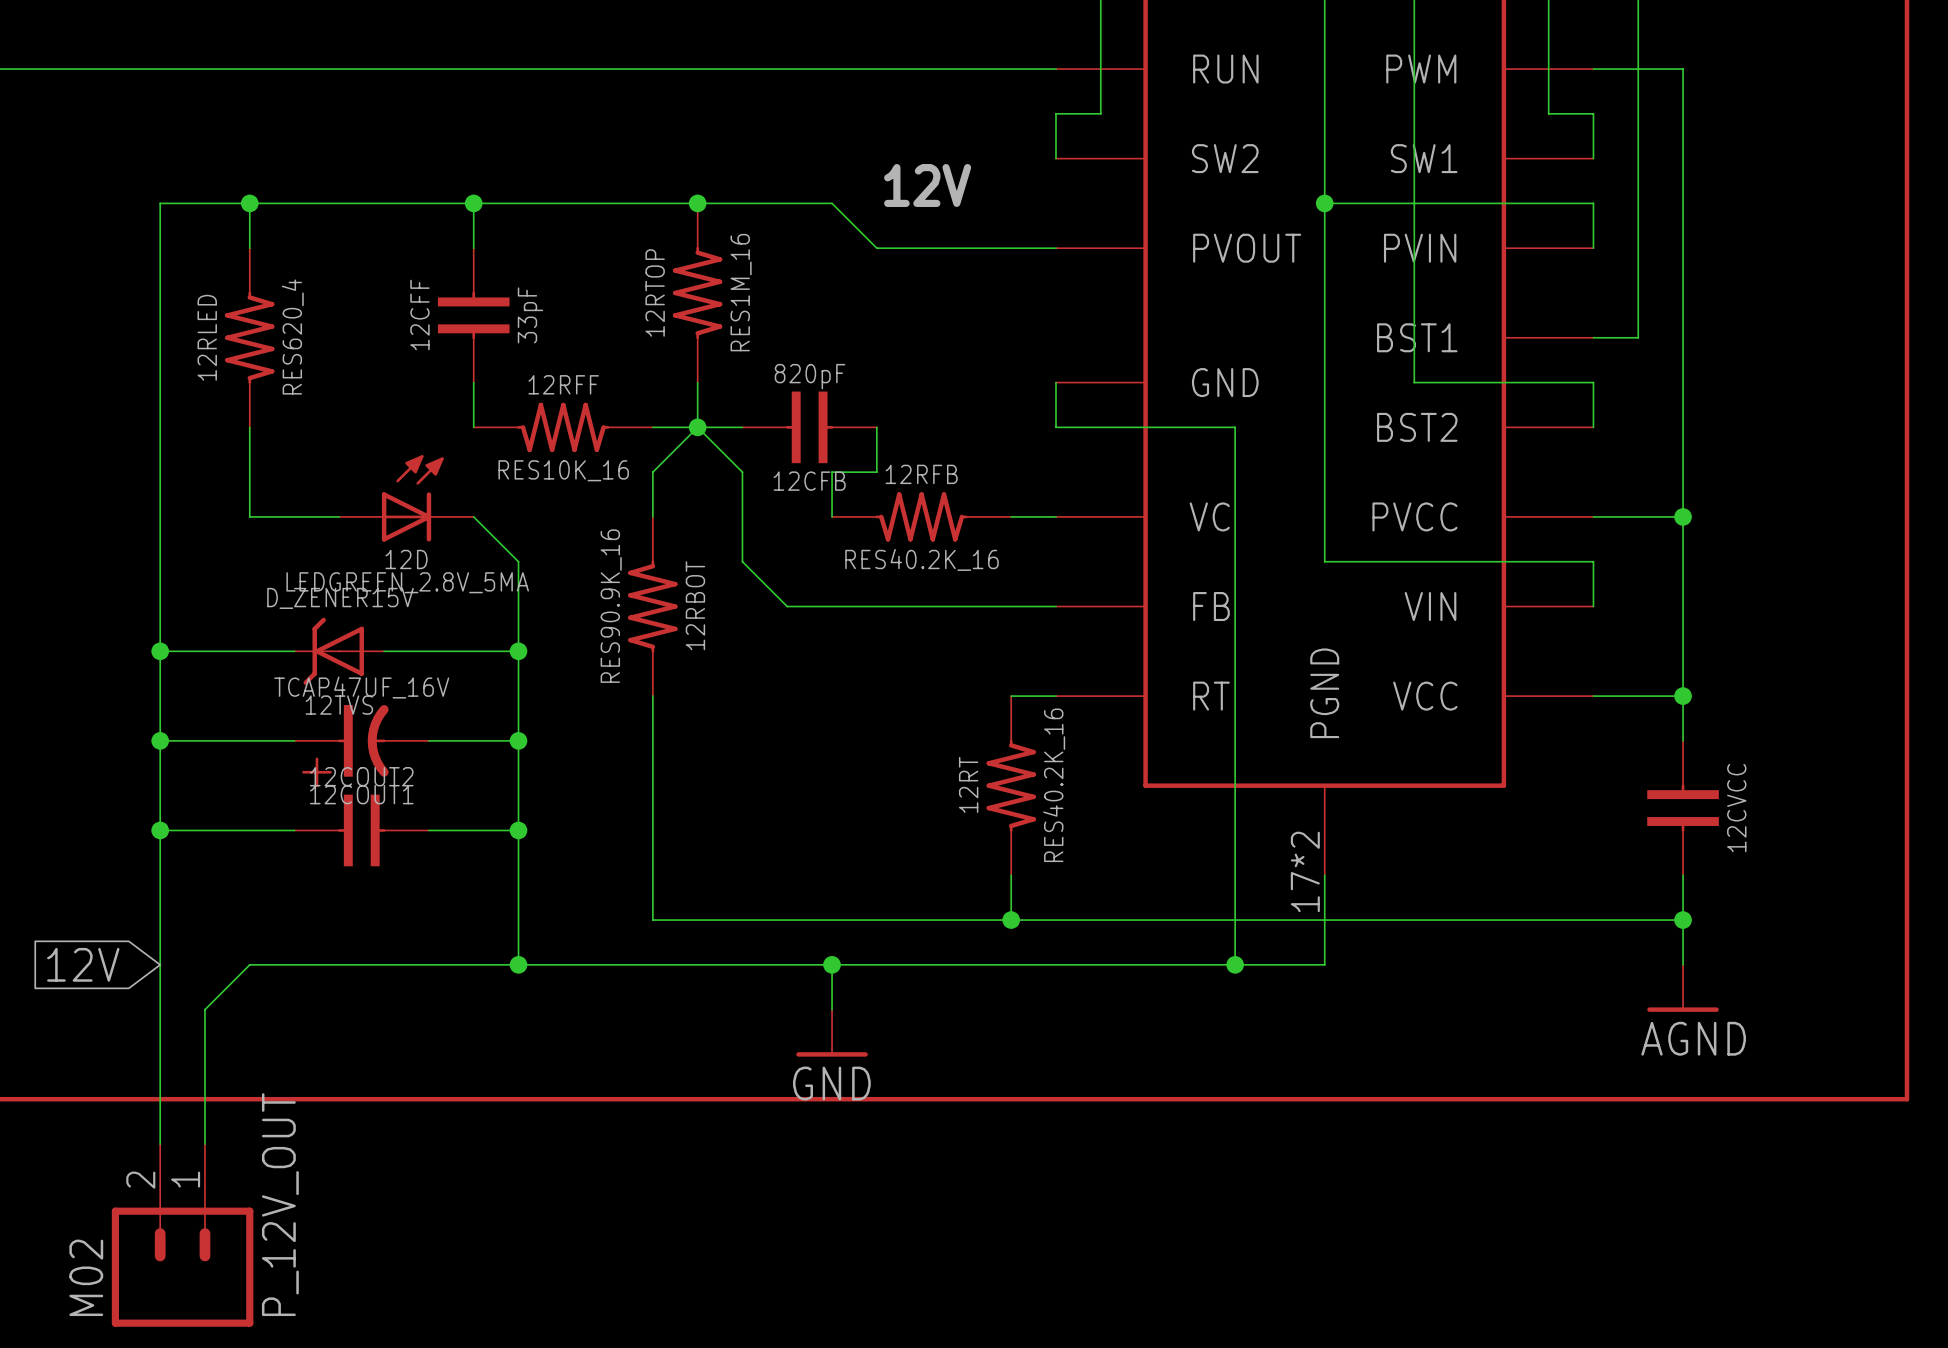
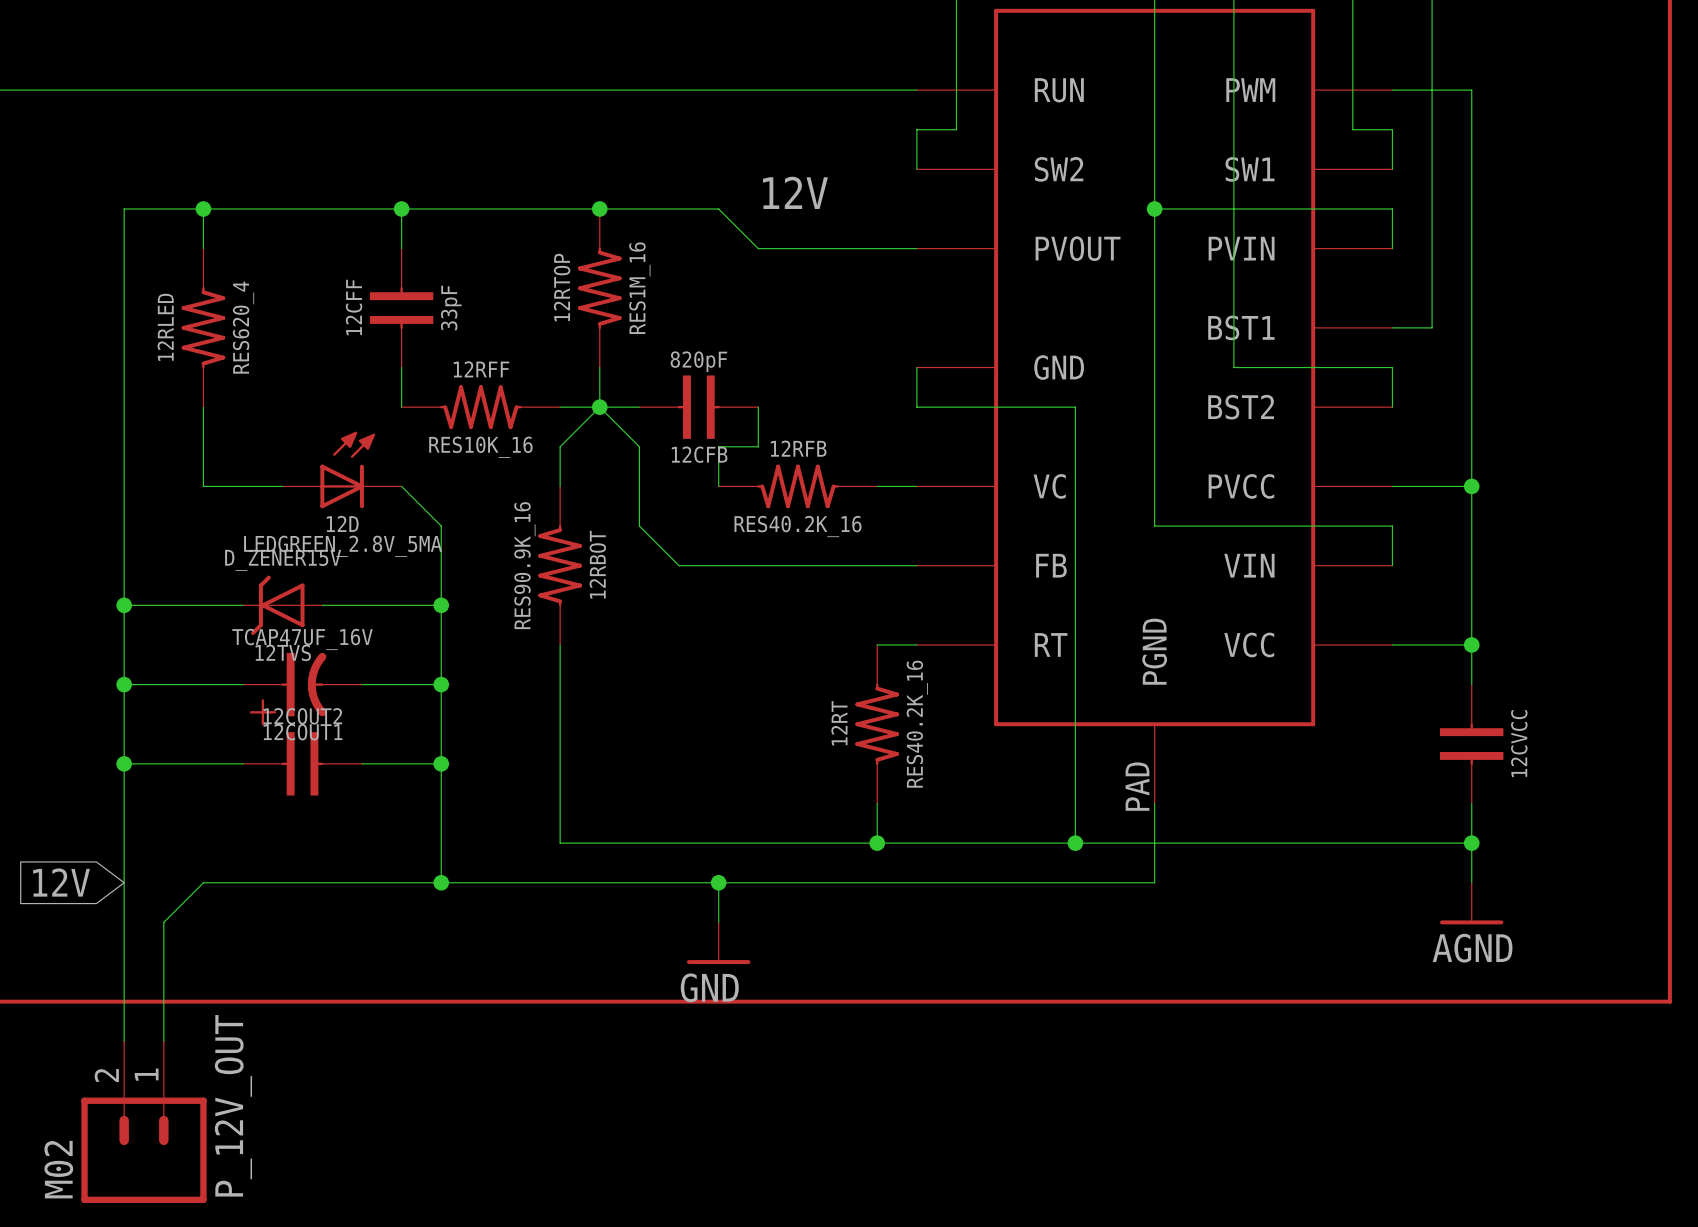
part pin number: 17*2 (1305, 871) -> PAD (1137, 786)
wire: (1235, 920) (1235, 964) -> none
junction position: (1235, 964) -> (1075, 843)

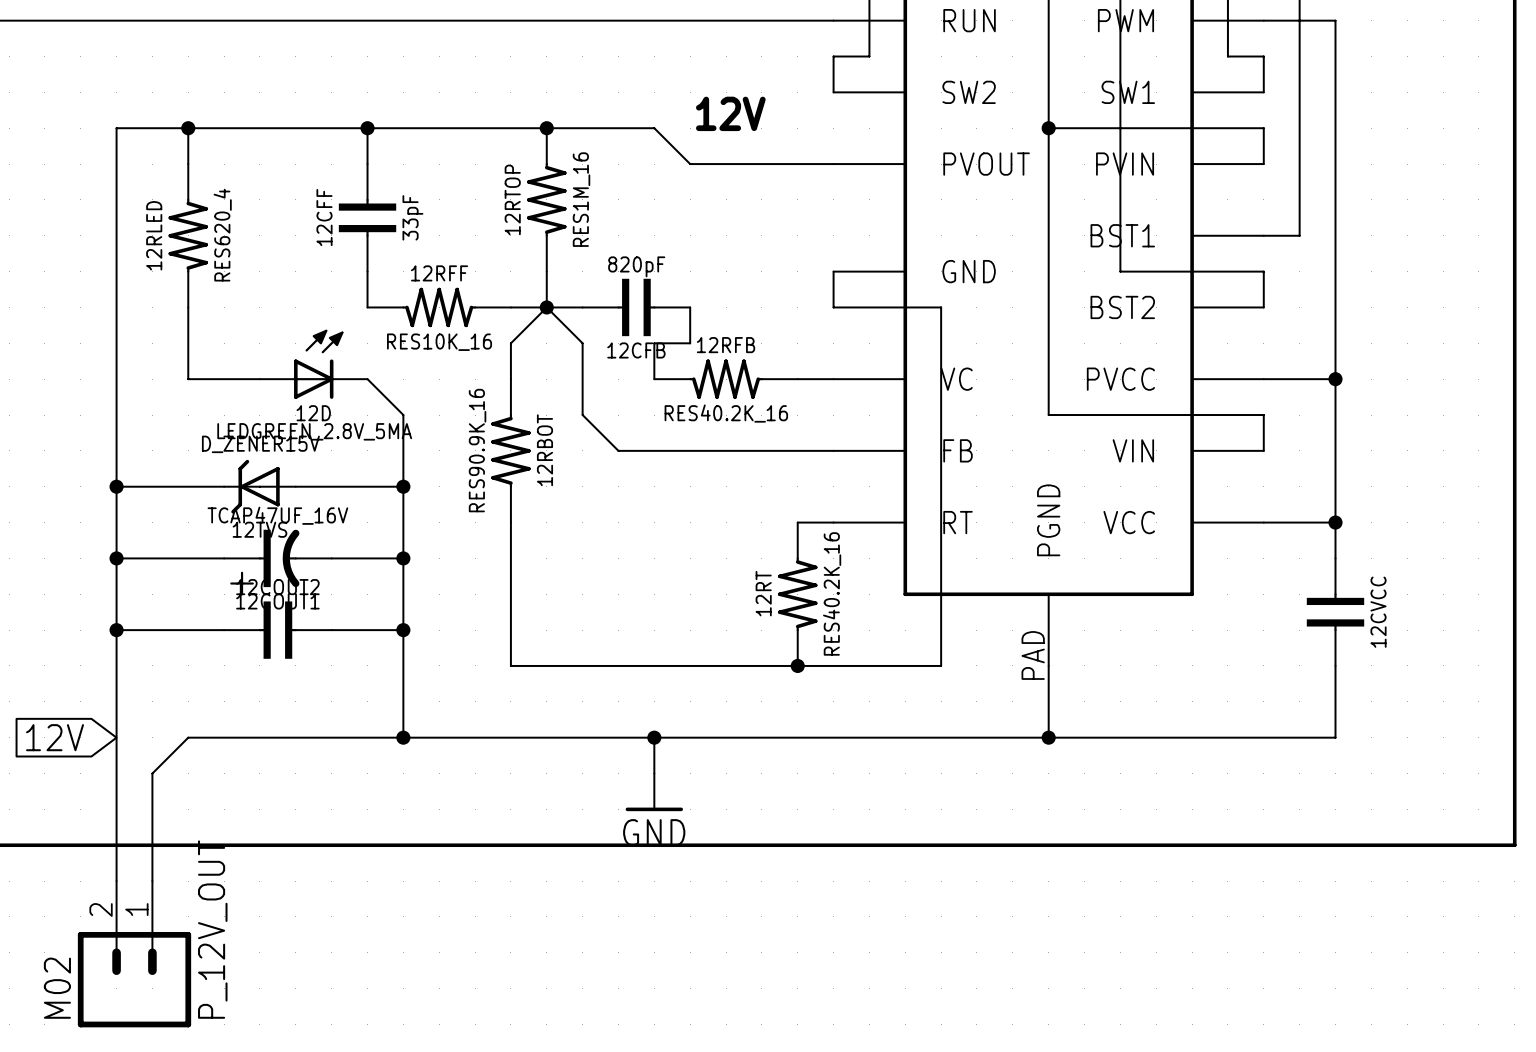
wire: (1035, 407) (1075, 407) (1075, 843) -> (941, 307) (941, 665) (510, 665)
wire: (560, 803) (560, 843) (1471, 843) -> none
wire: (877, 803) (877, 843) -> none
junction position: (877, 843) -> (797, 665)
junction position: (1075, 843) -> (1048, 737)
junction: (1471, 843) -> none
wire: none -> (1048, 737) (1335, 737)
power symbol: AGND (1471, 903) -> none

